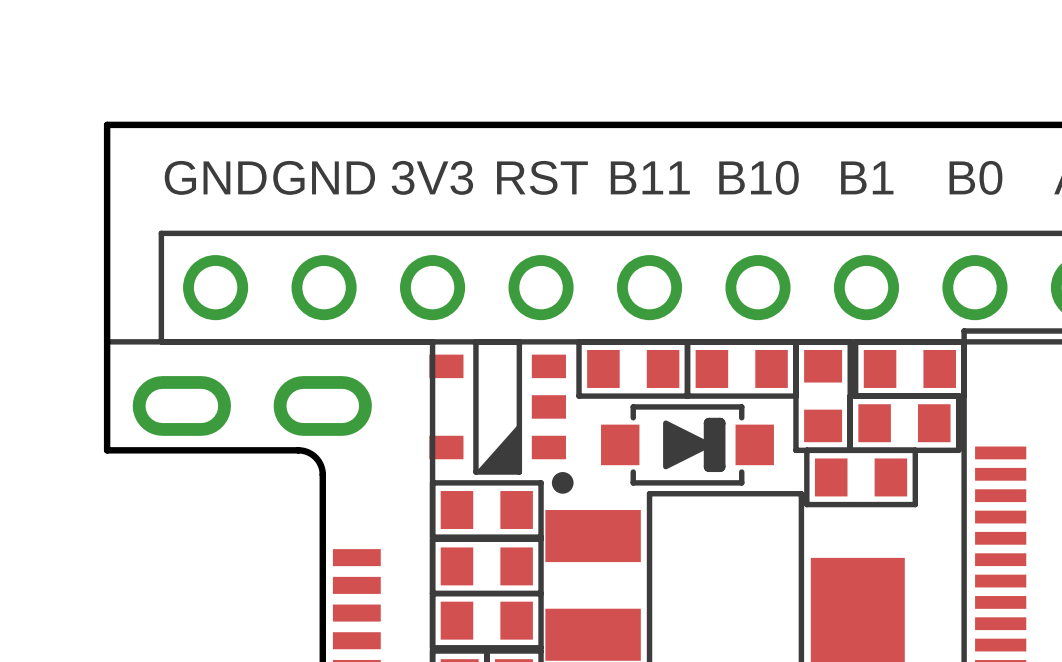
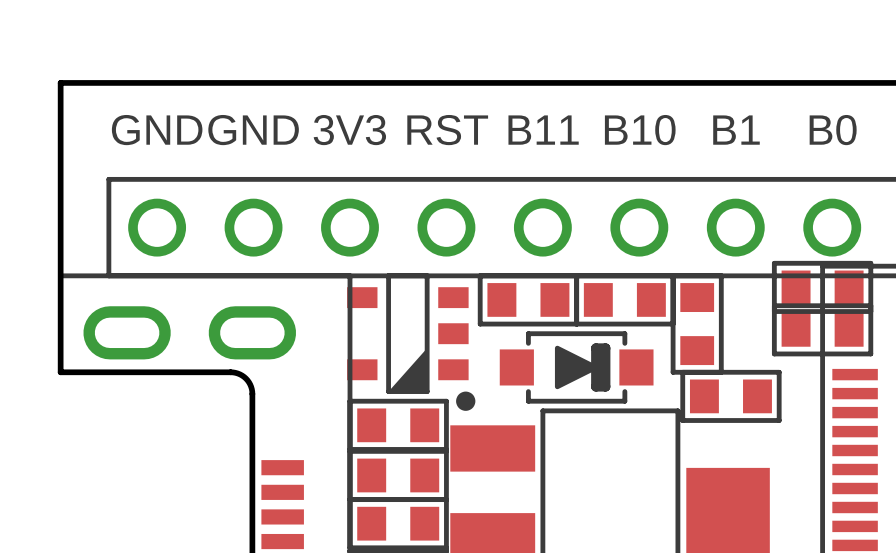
part: none -> (822, 287)
part: (909, 368) -> none
part: none -> (822, 329)
part: (904, 423) -> none

